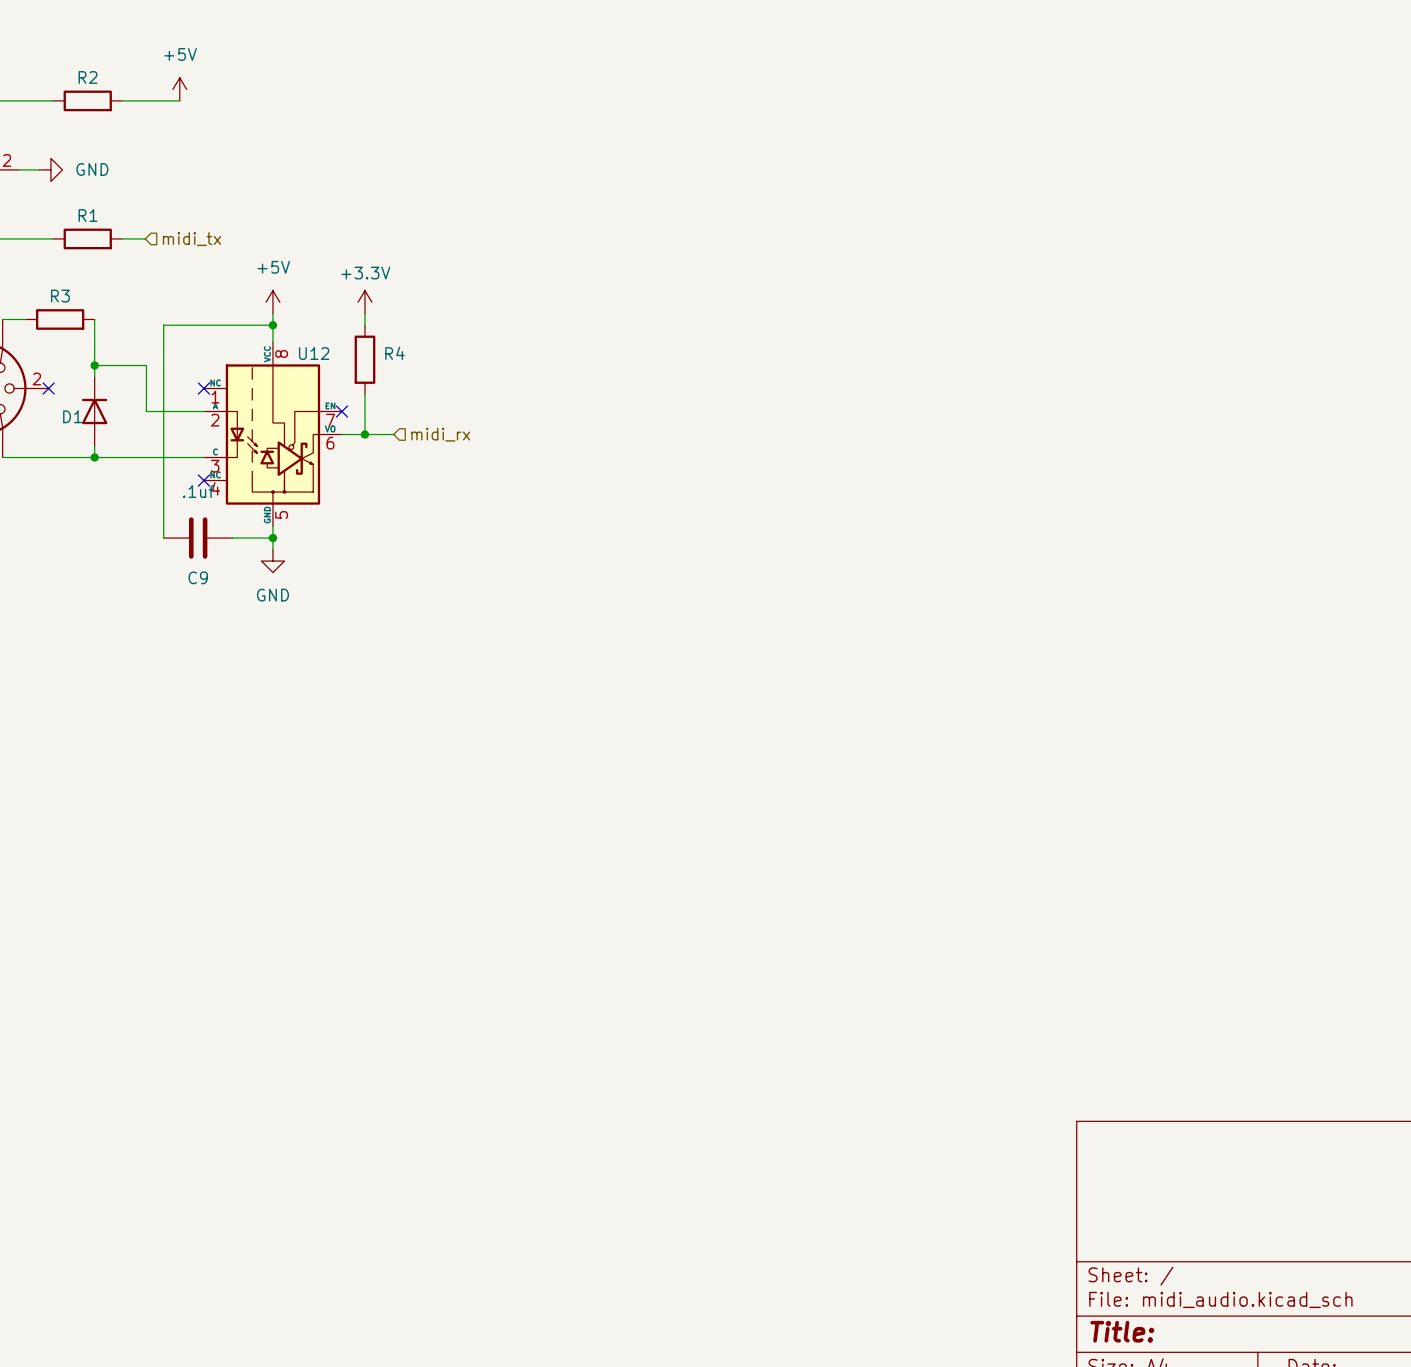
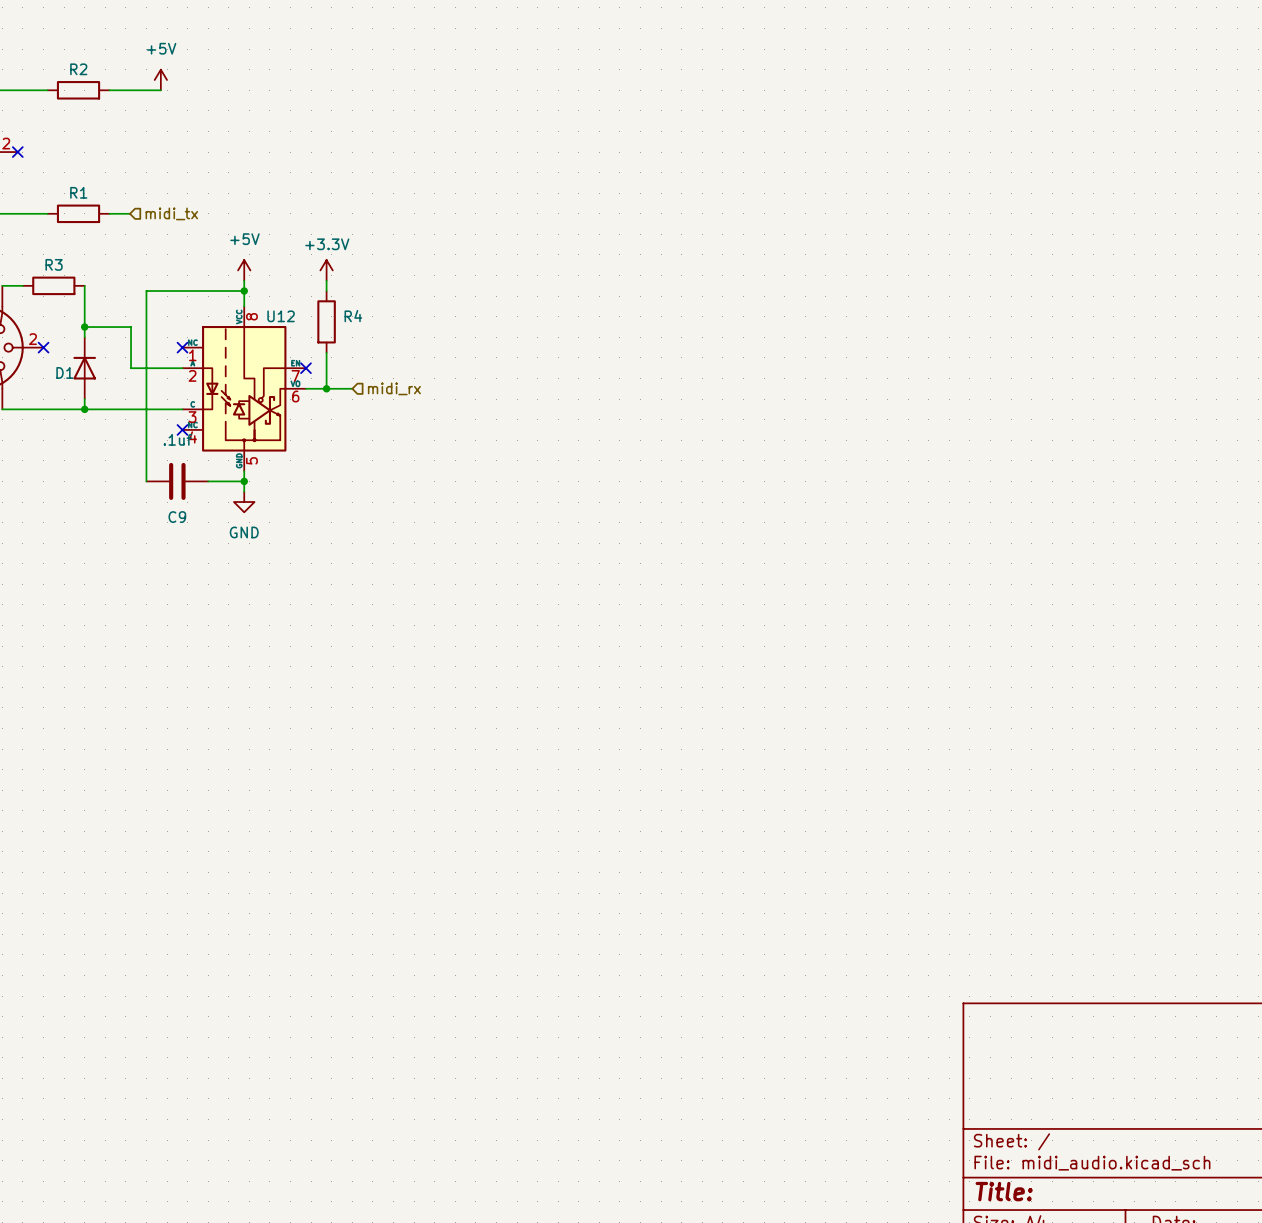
wire: (18, 169) (39, 169) -> none
no-connect mark: none -> (17, 152)
power symbol: GND (50, 169) -> none

